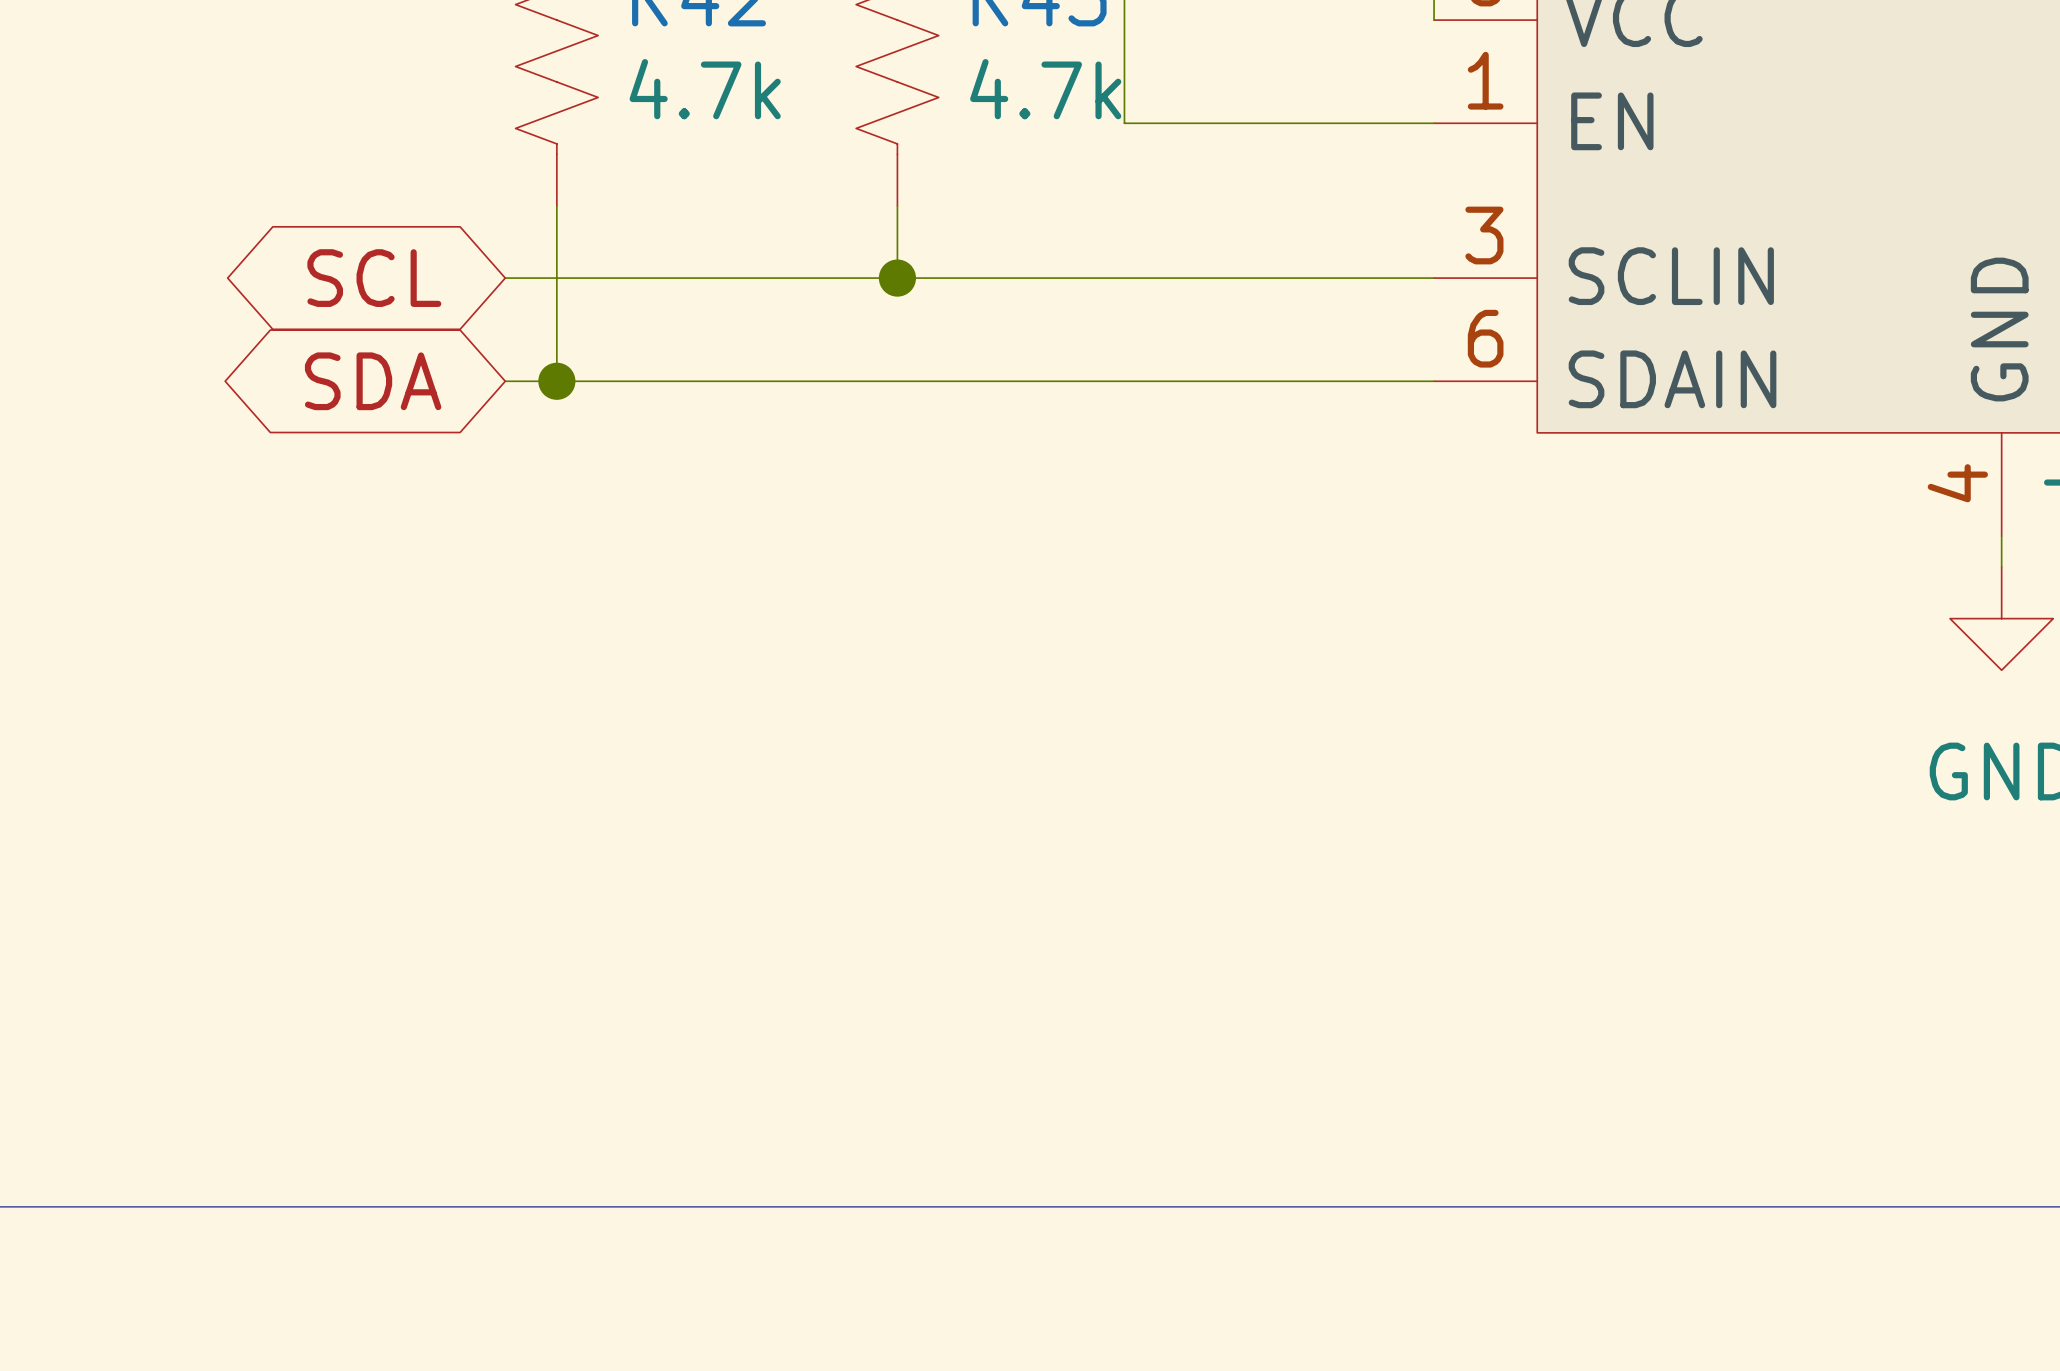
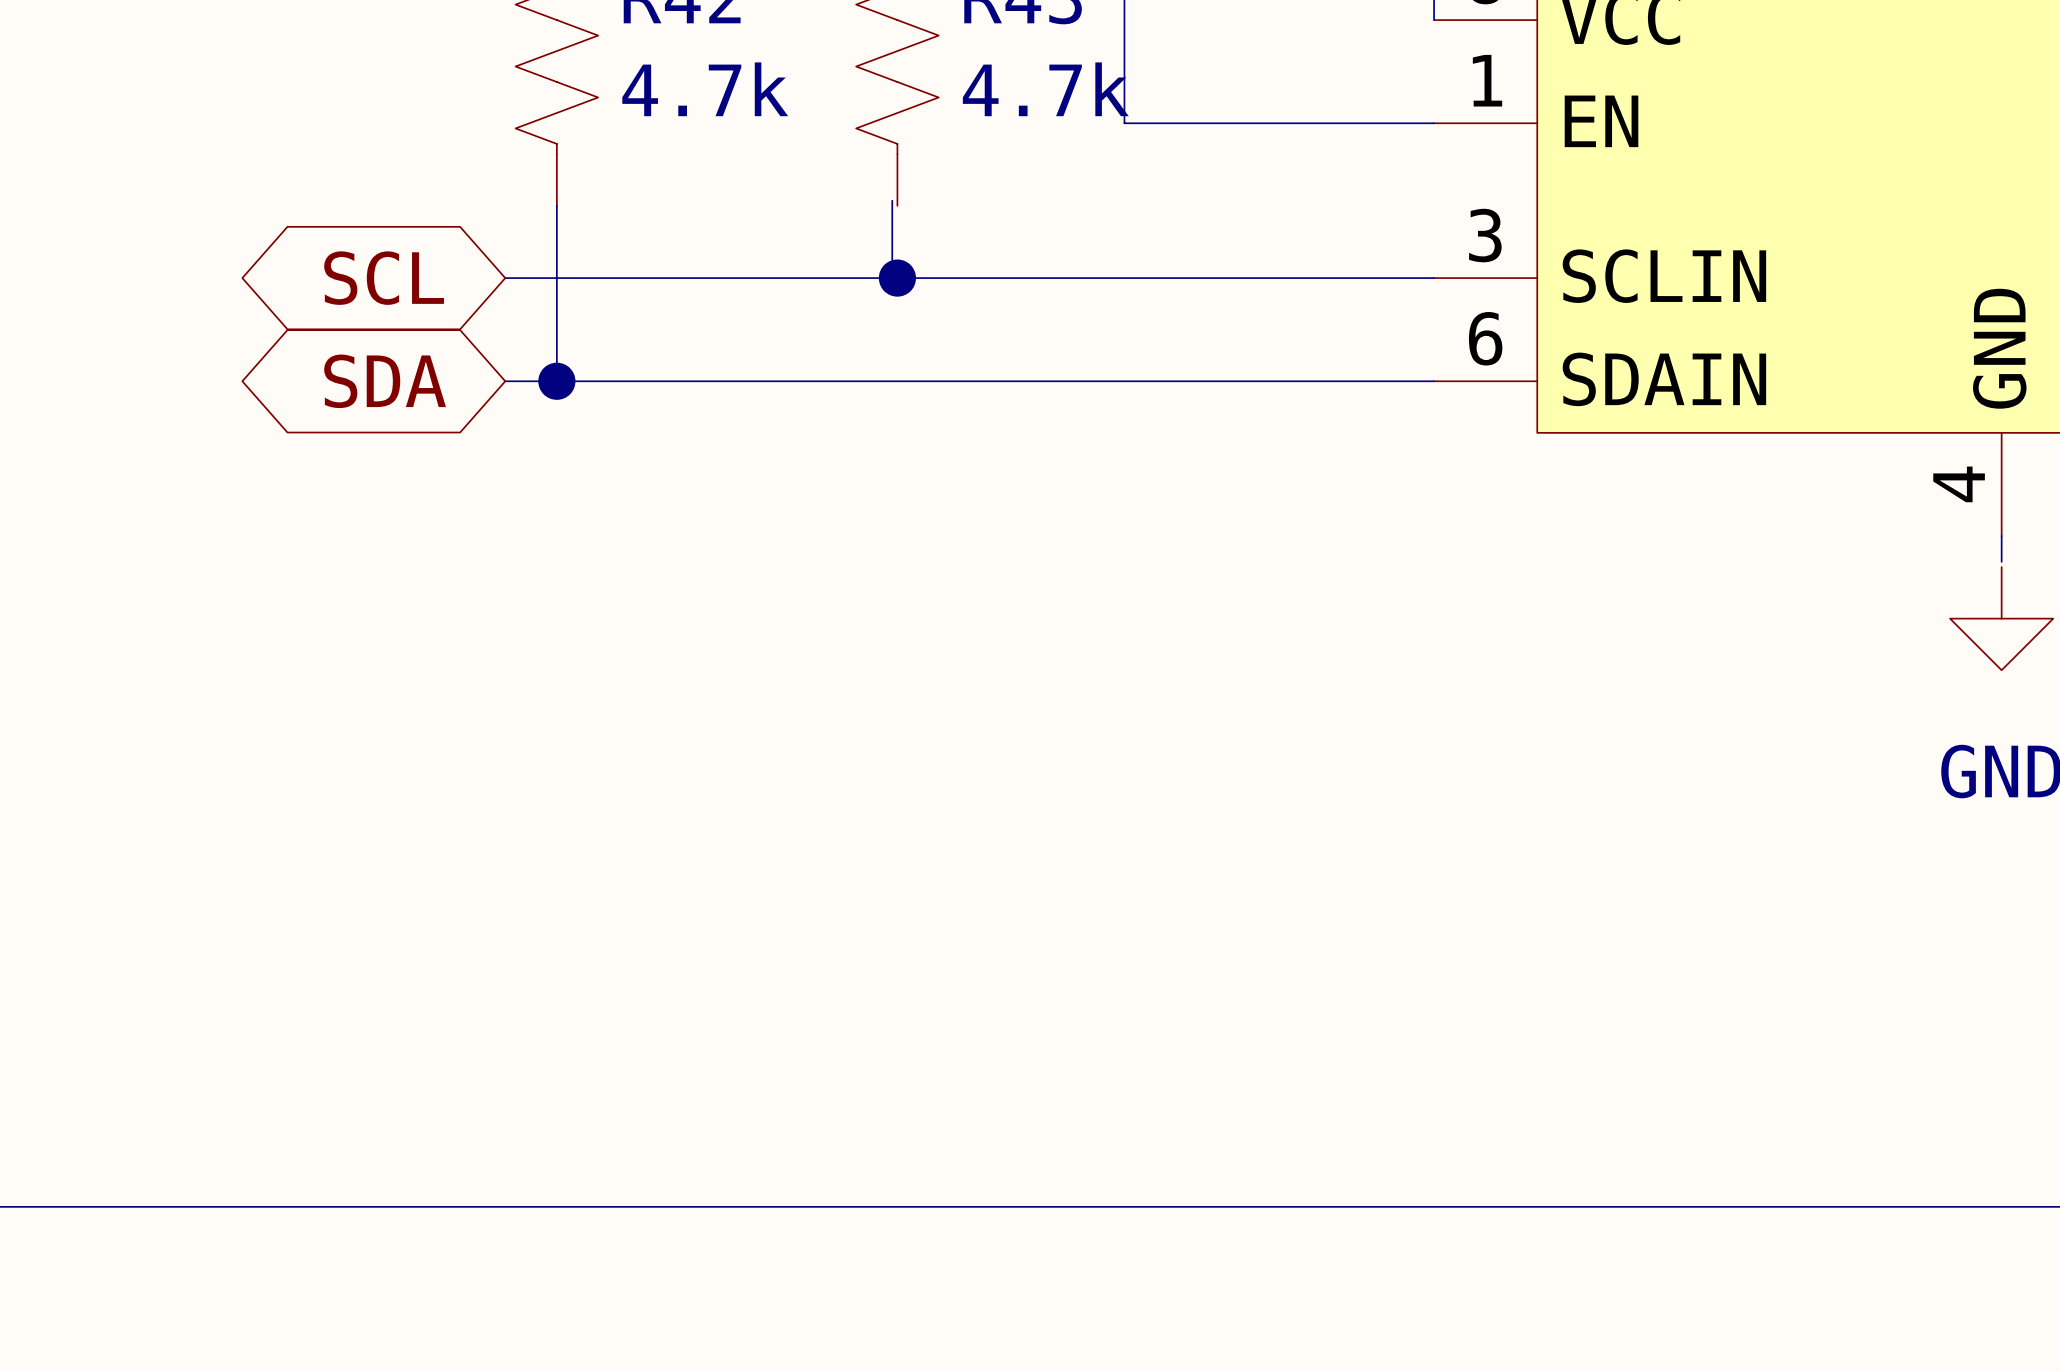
wire: none -> (892, 200) (892, 278)
wire: (897, 205) (897, 278) -> none
wire: (2001, 561) (2001, 567) -> none

